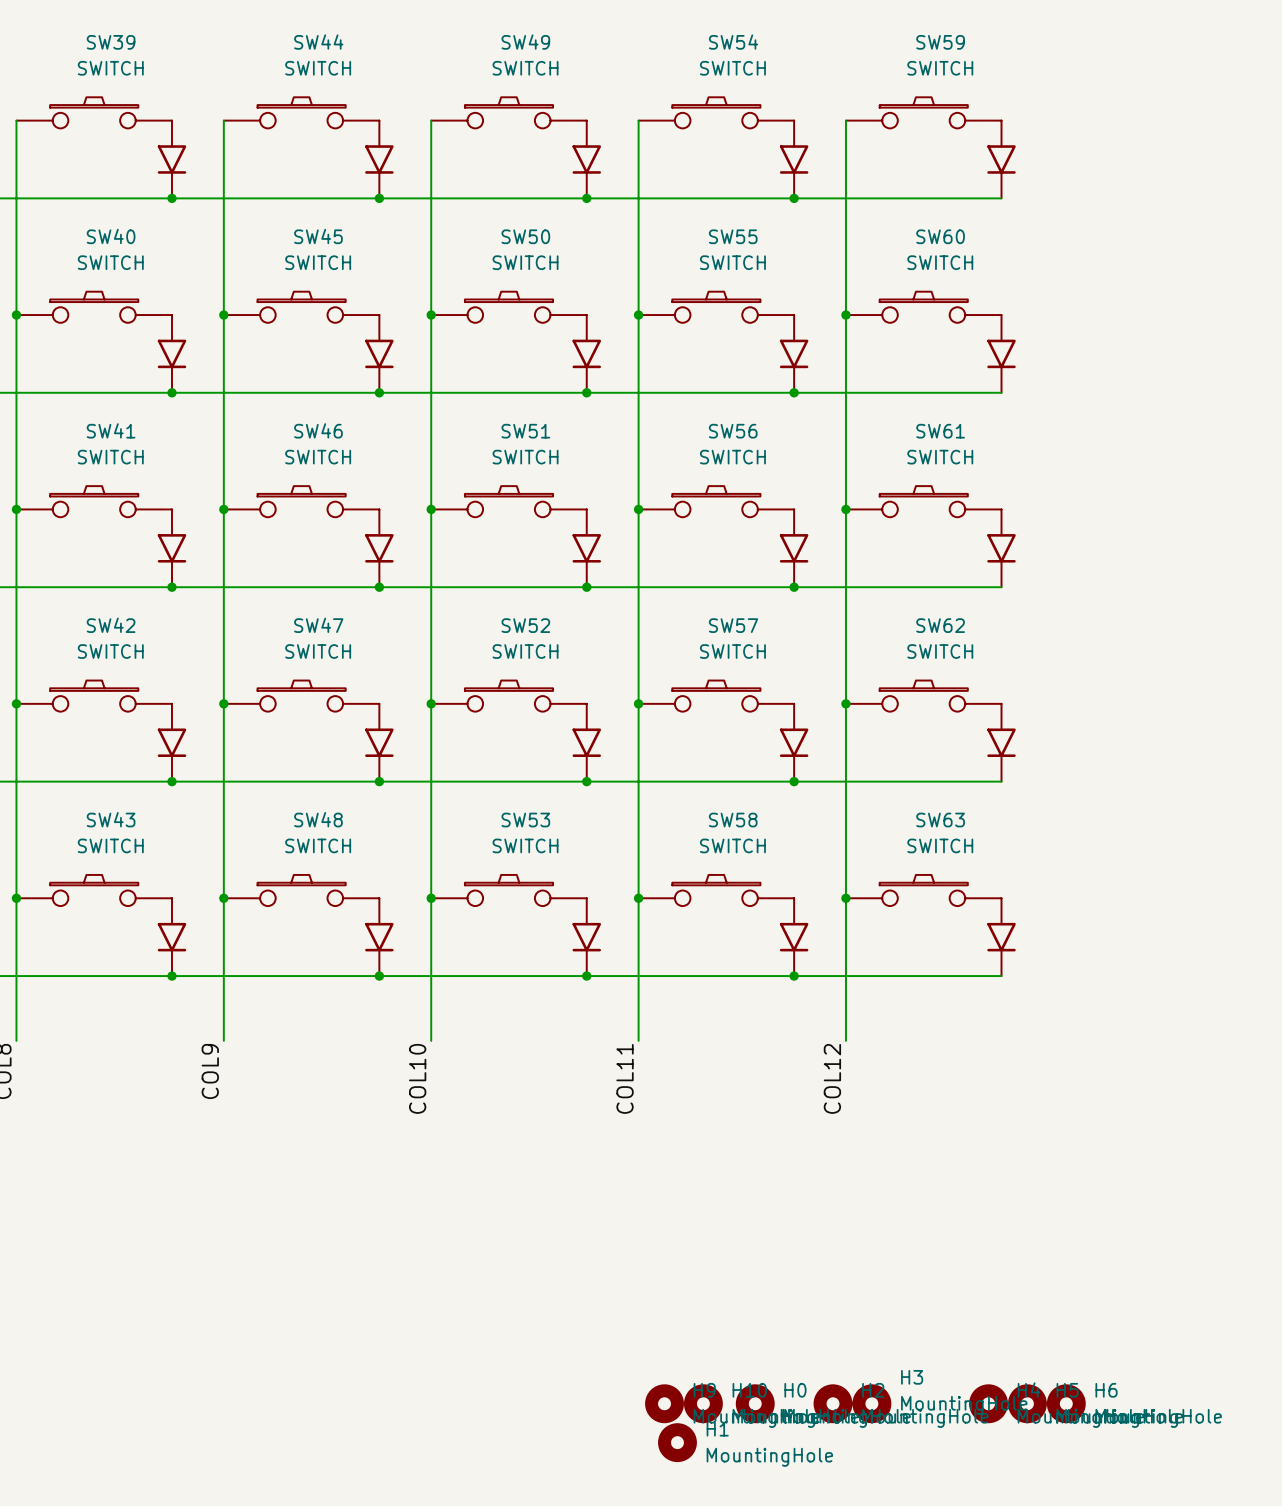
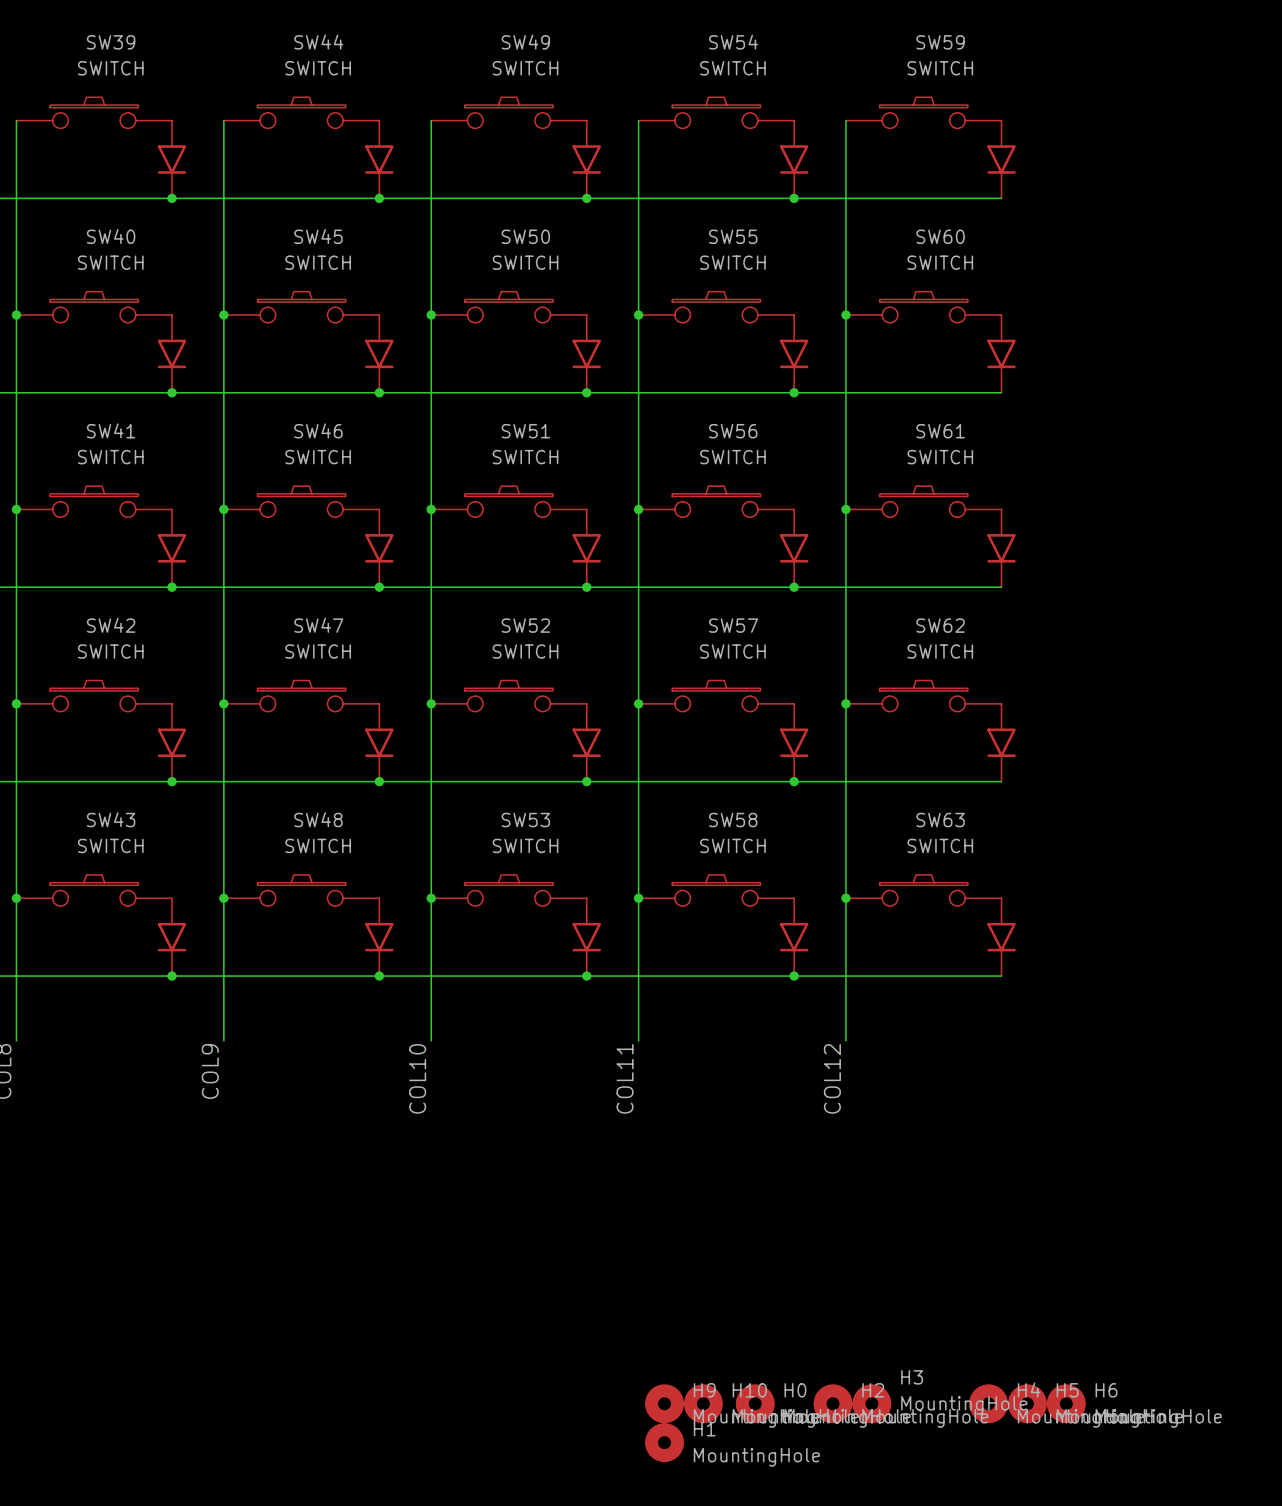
H1 position: (677, 1442) -> (664, 1442)

